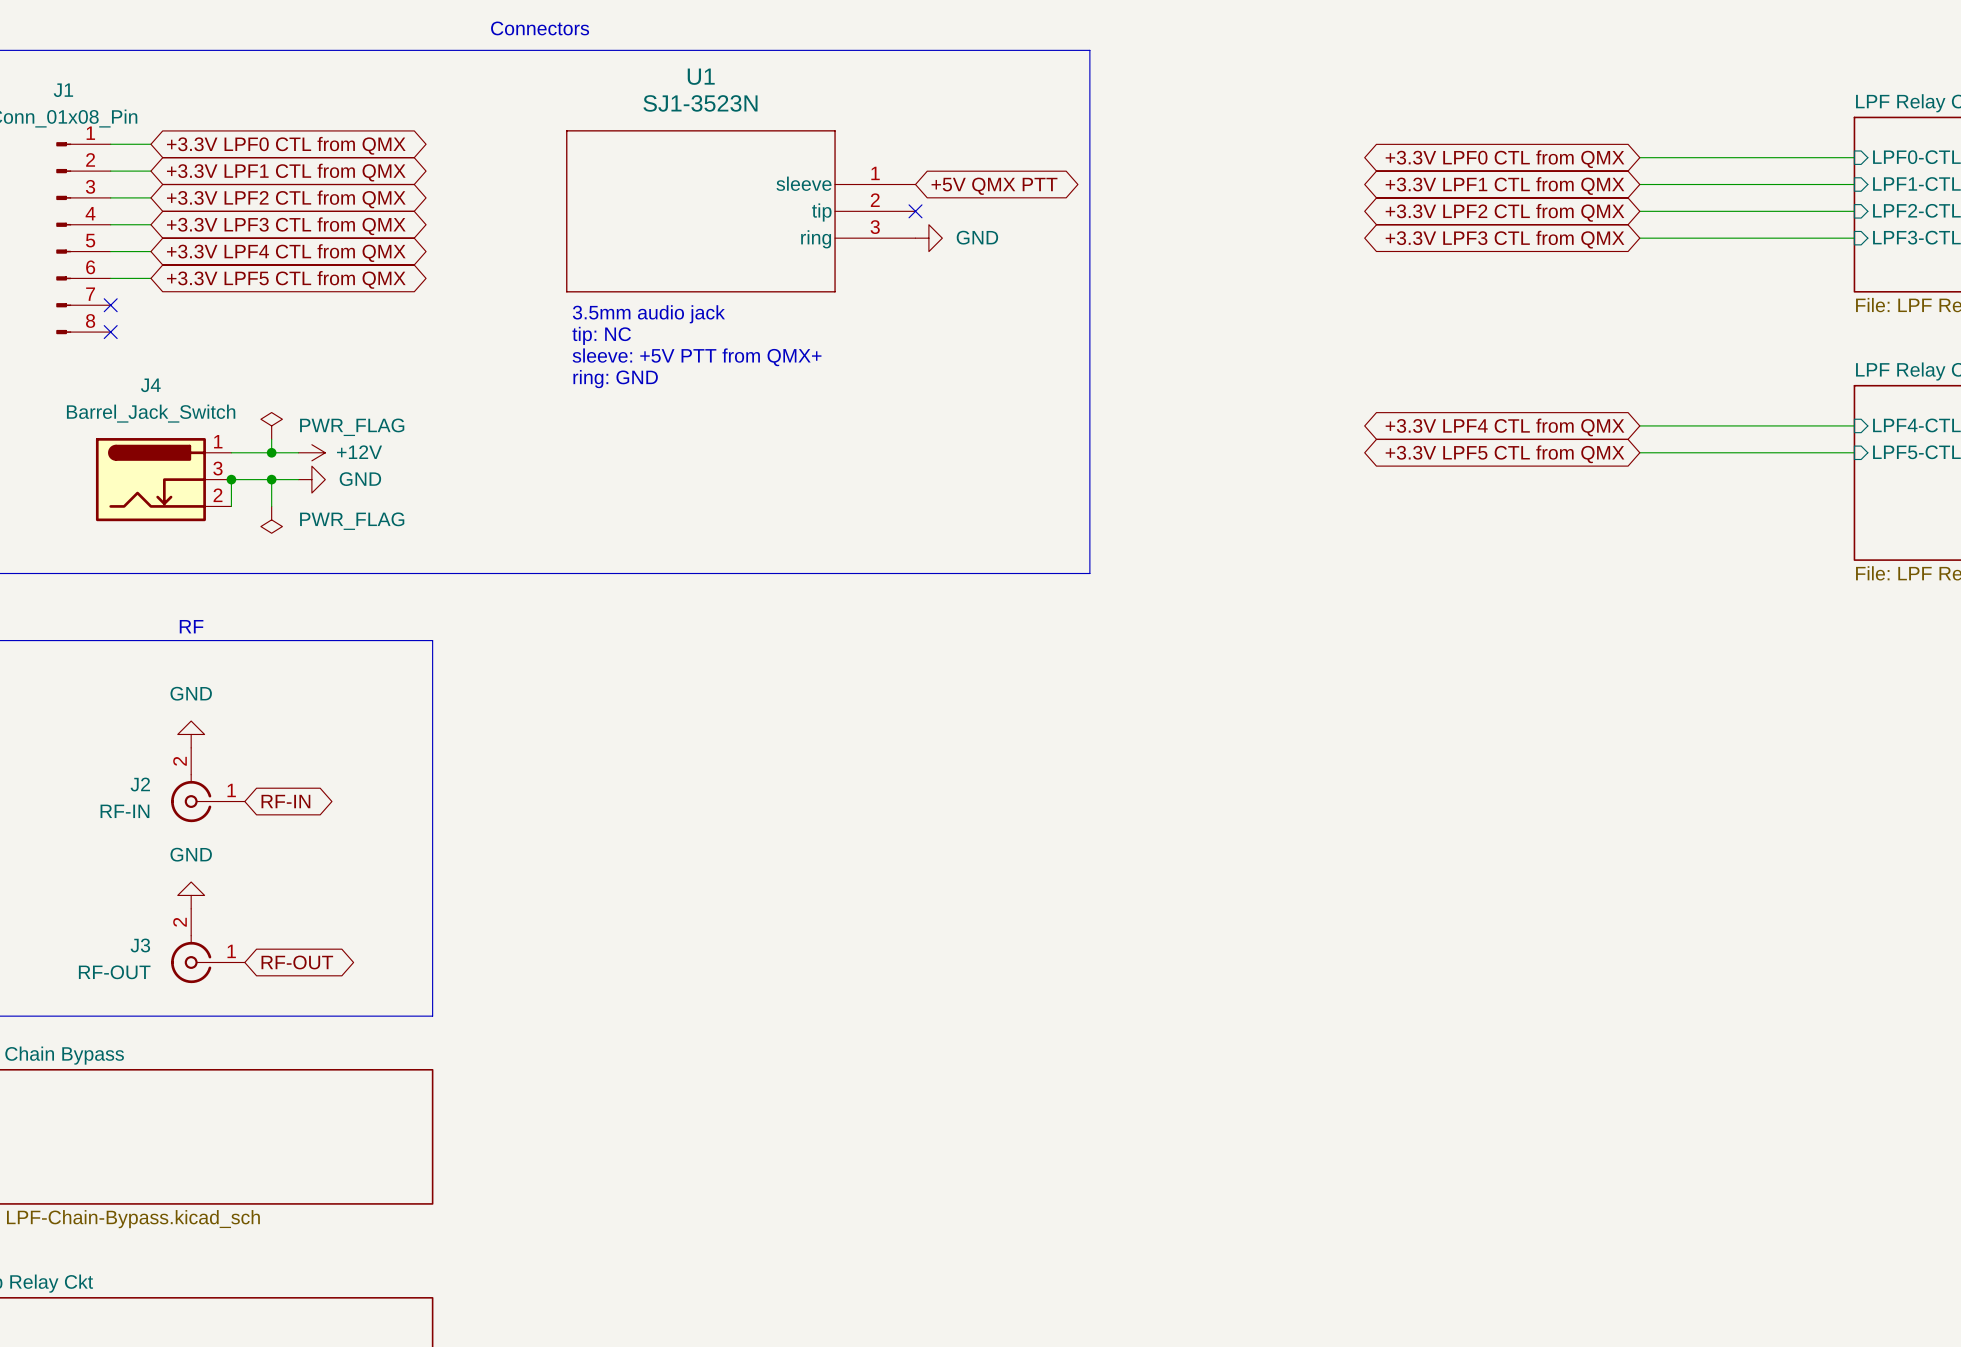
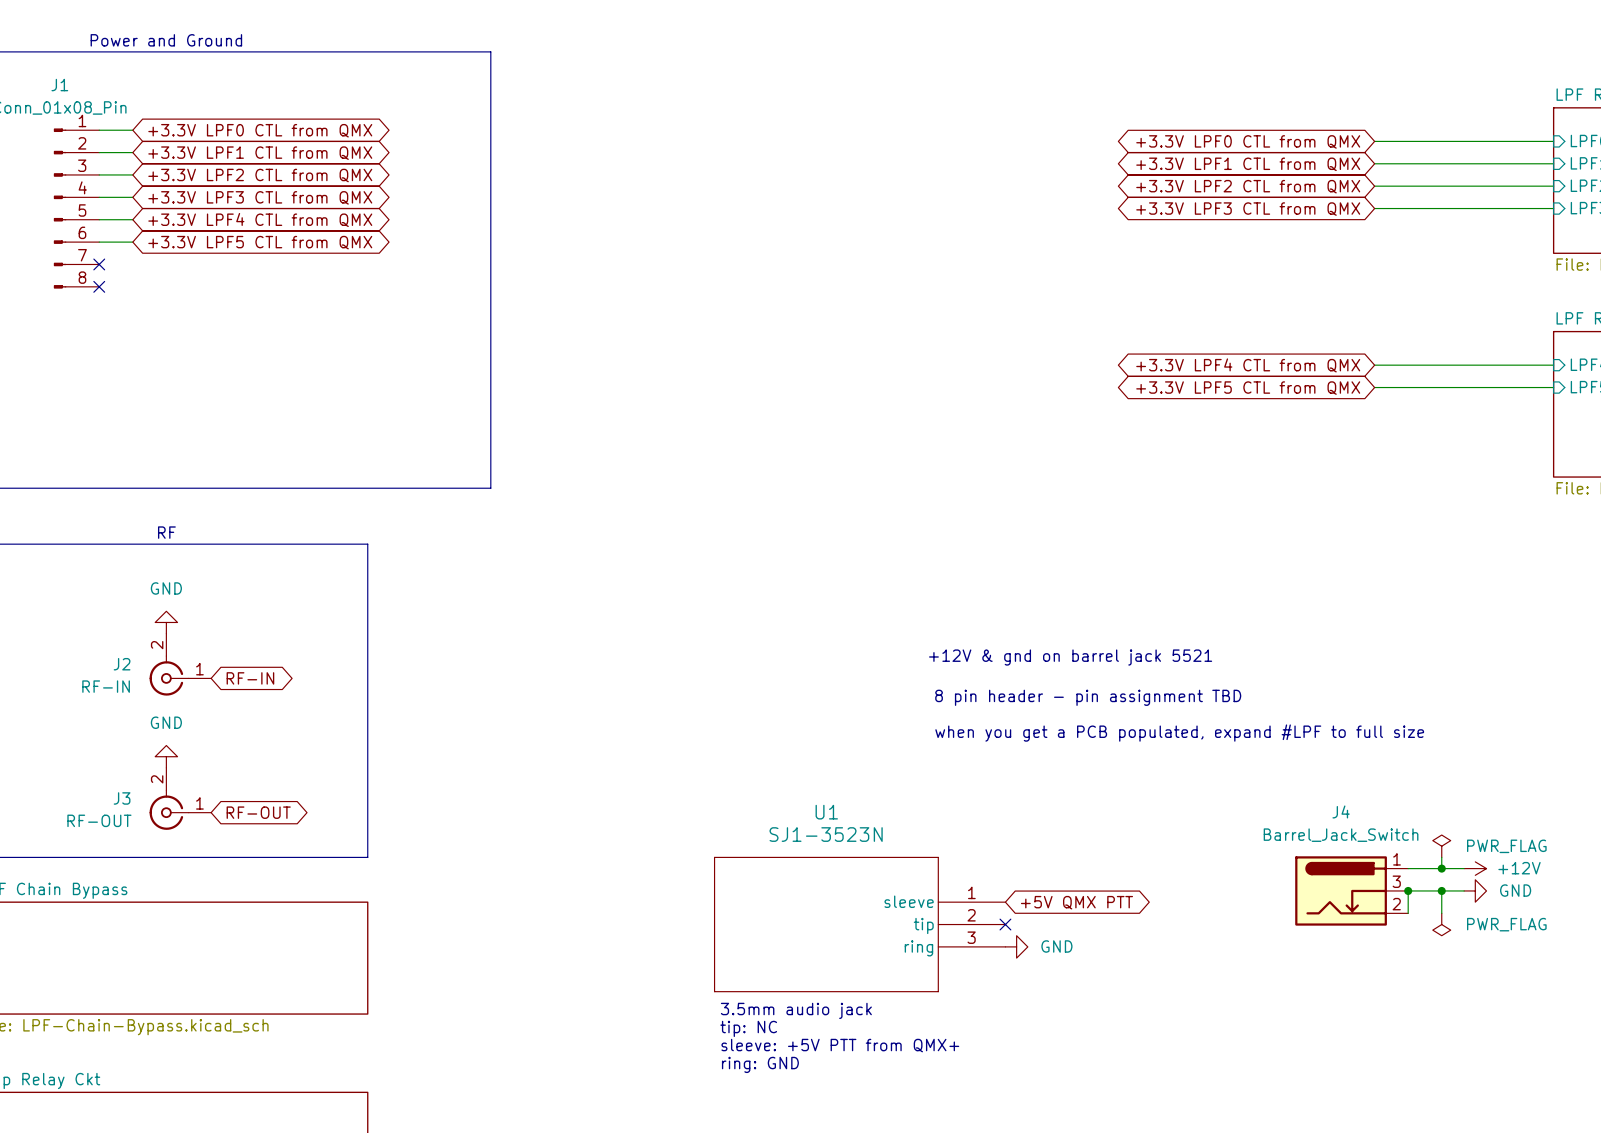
text: Connectors (540, 28) -> none
text: none -> Power and Ground (166, 40)
line: (580, 50) (1089, 50) (1089, 573) (580, 573) -> (490, 51) (490, 488)
global label: +5V QMX PTT (994, 186) -> none
U1 position: (740, 211) -> (859, 924)
no-connect mark: (915, 211) -> none
power symbol: GND (928, 238) -> none
text: 3.5mm audio jack (648, 314) -> none
text: tip: NC (601, 335) -> none
text: sleeve: +5V PTT from QMX+ (697, 357) -> none
text: ring: GND (615, 379) -> none
power symbol: PWR_FLAG (271, 425) -> none
wire: (271, 439) (271, 452) -> none
wire: (231, 452) (298, 452) -> none
junction: (271, 452) -> none
power symbol: +12V (311, 452) -> none
J4 position: (163, 479) -> (1351, 890)
junction: (231, 479) -> none
wire: (271, 479) (271, 506) -> none
junction: (271, 479) -> none
wire: (298, 479) (231, 479) (231, 506) -> none
power symbol: GND (311, 479) -> none
power symbol: PWR_FLAG (271, 519) -> none
text: none -> +12V & gnd on barrel jack 5521 (1070, 657)
text: none -> 8 pin header - pin assignment TBD (1088, 697)
text: none -> when you get a PCB populated, expand #LPF to full size (1179, 733)
power symbol: none -> PWR_FLAG (1441, 846)
wire: none -> (1441, 857) (1441, 868)
wire: none -> (1408, 868) (1464, 868)
junction: none -> (1441, 868)
power symbol: none -> +12V (1475, 868)
junction: none -> (1408, 890)
wire: none -> (1441, 890) (1441, 913)
junction: none -> (1441, 890)
wire: none -> (1464, 890) (1408, 890) (1408, 913)
power symbol: none -> GND (1475, 890)
global label: none -> +5V QMX PTT (1076, 902)
no-connect mark: none -> (1005, 924)
power symbol: none -> PWR_FLAG (1441, 924)
power symbol: none -> GND (1016, 946)
text: none -> 3.5mm audio jack (796, 1010)
text: none -> tip: NC (748, 1028)
text: none -> sleeve: +5V PTT from QMX+ (840, 1045)
text: none -> ring: GND (760, 1064)

